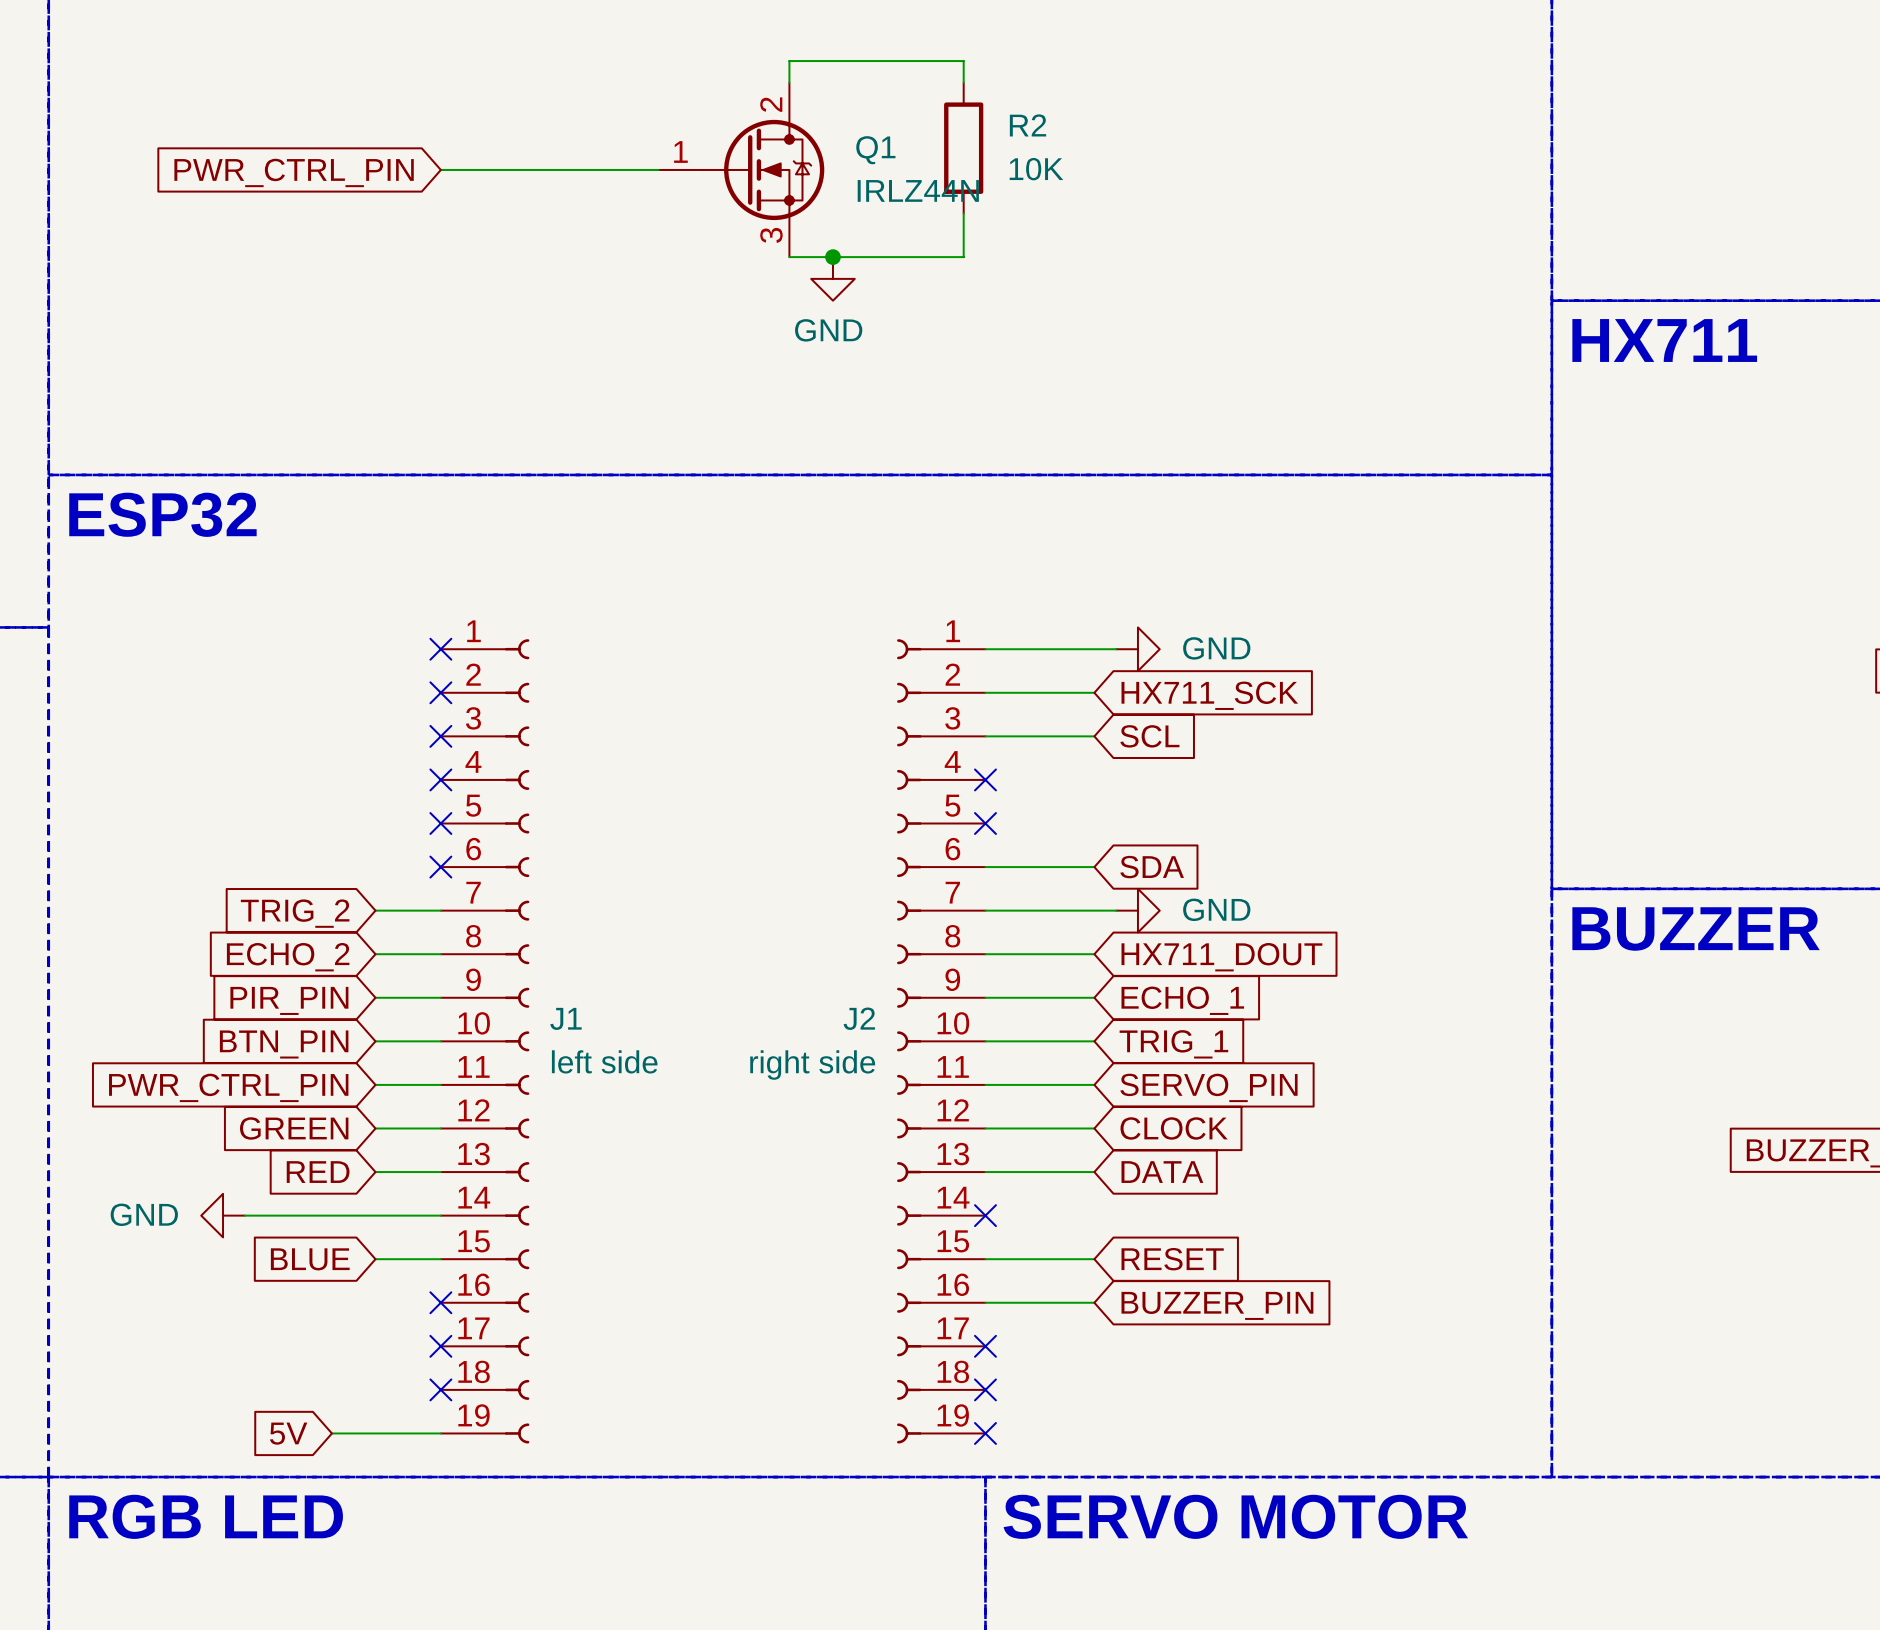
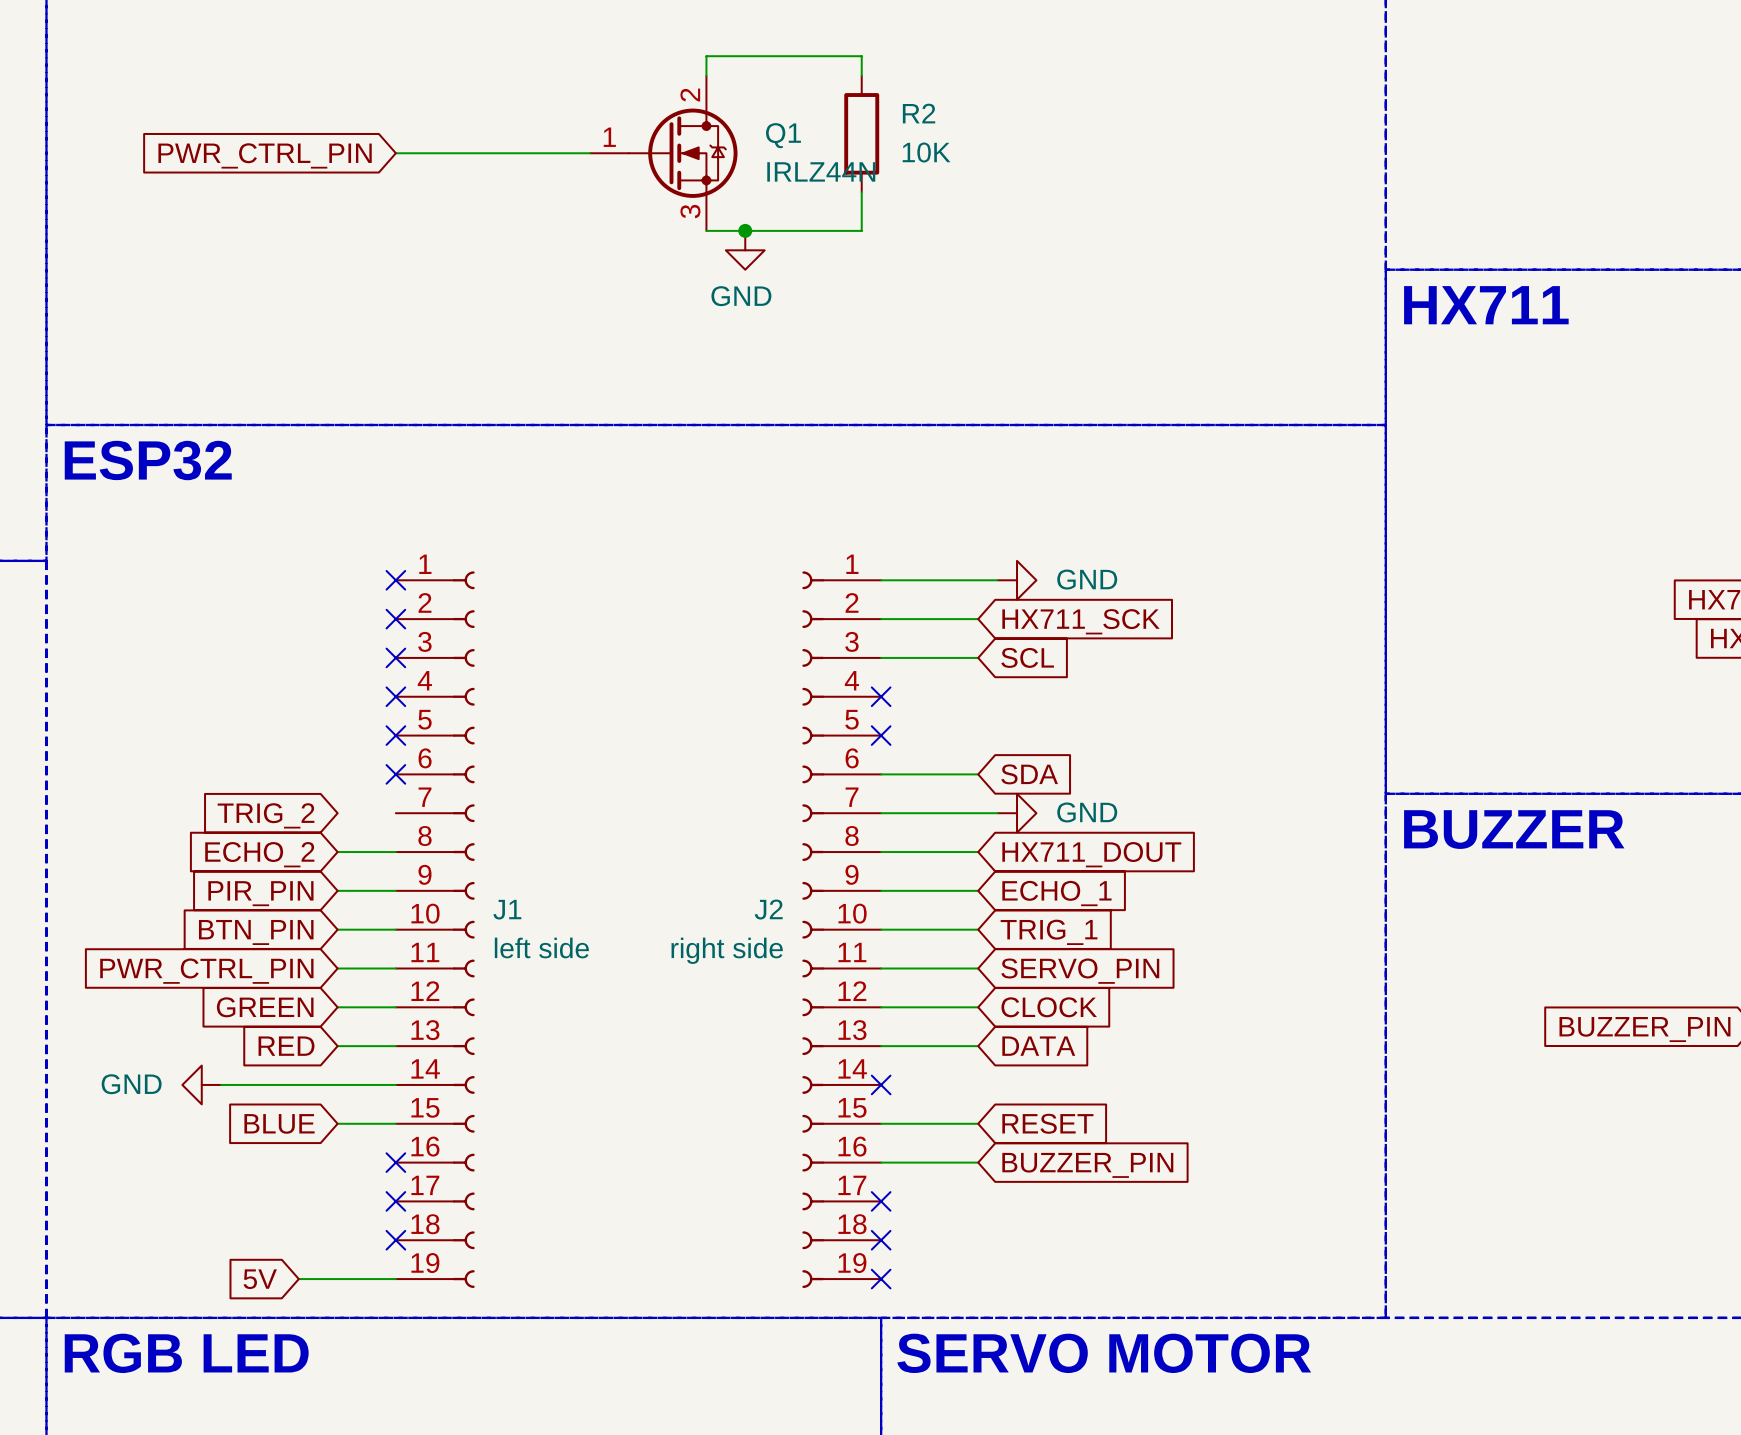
wire: (375, 910) (440, 910) -> none

